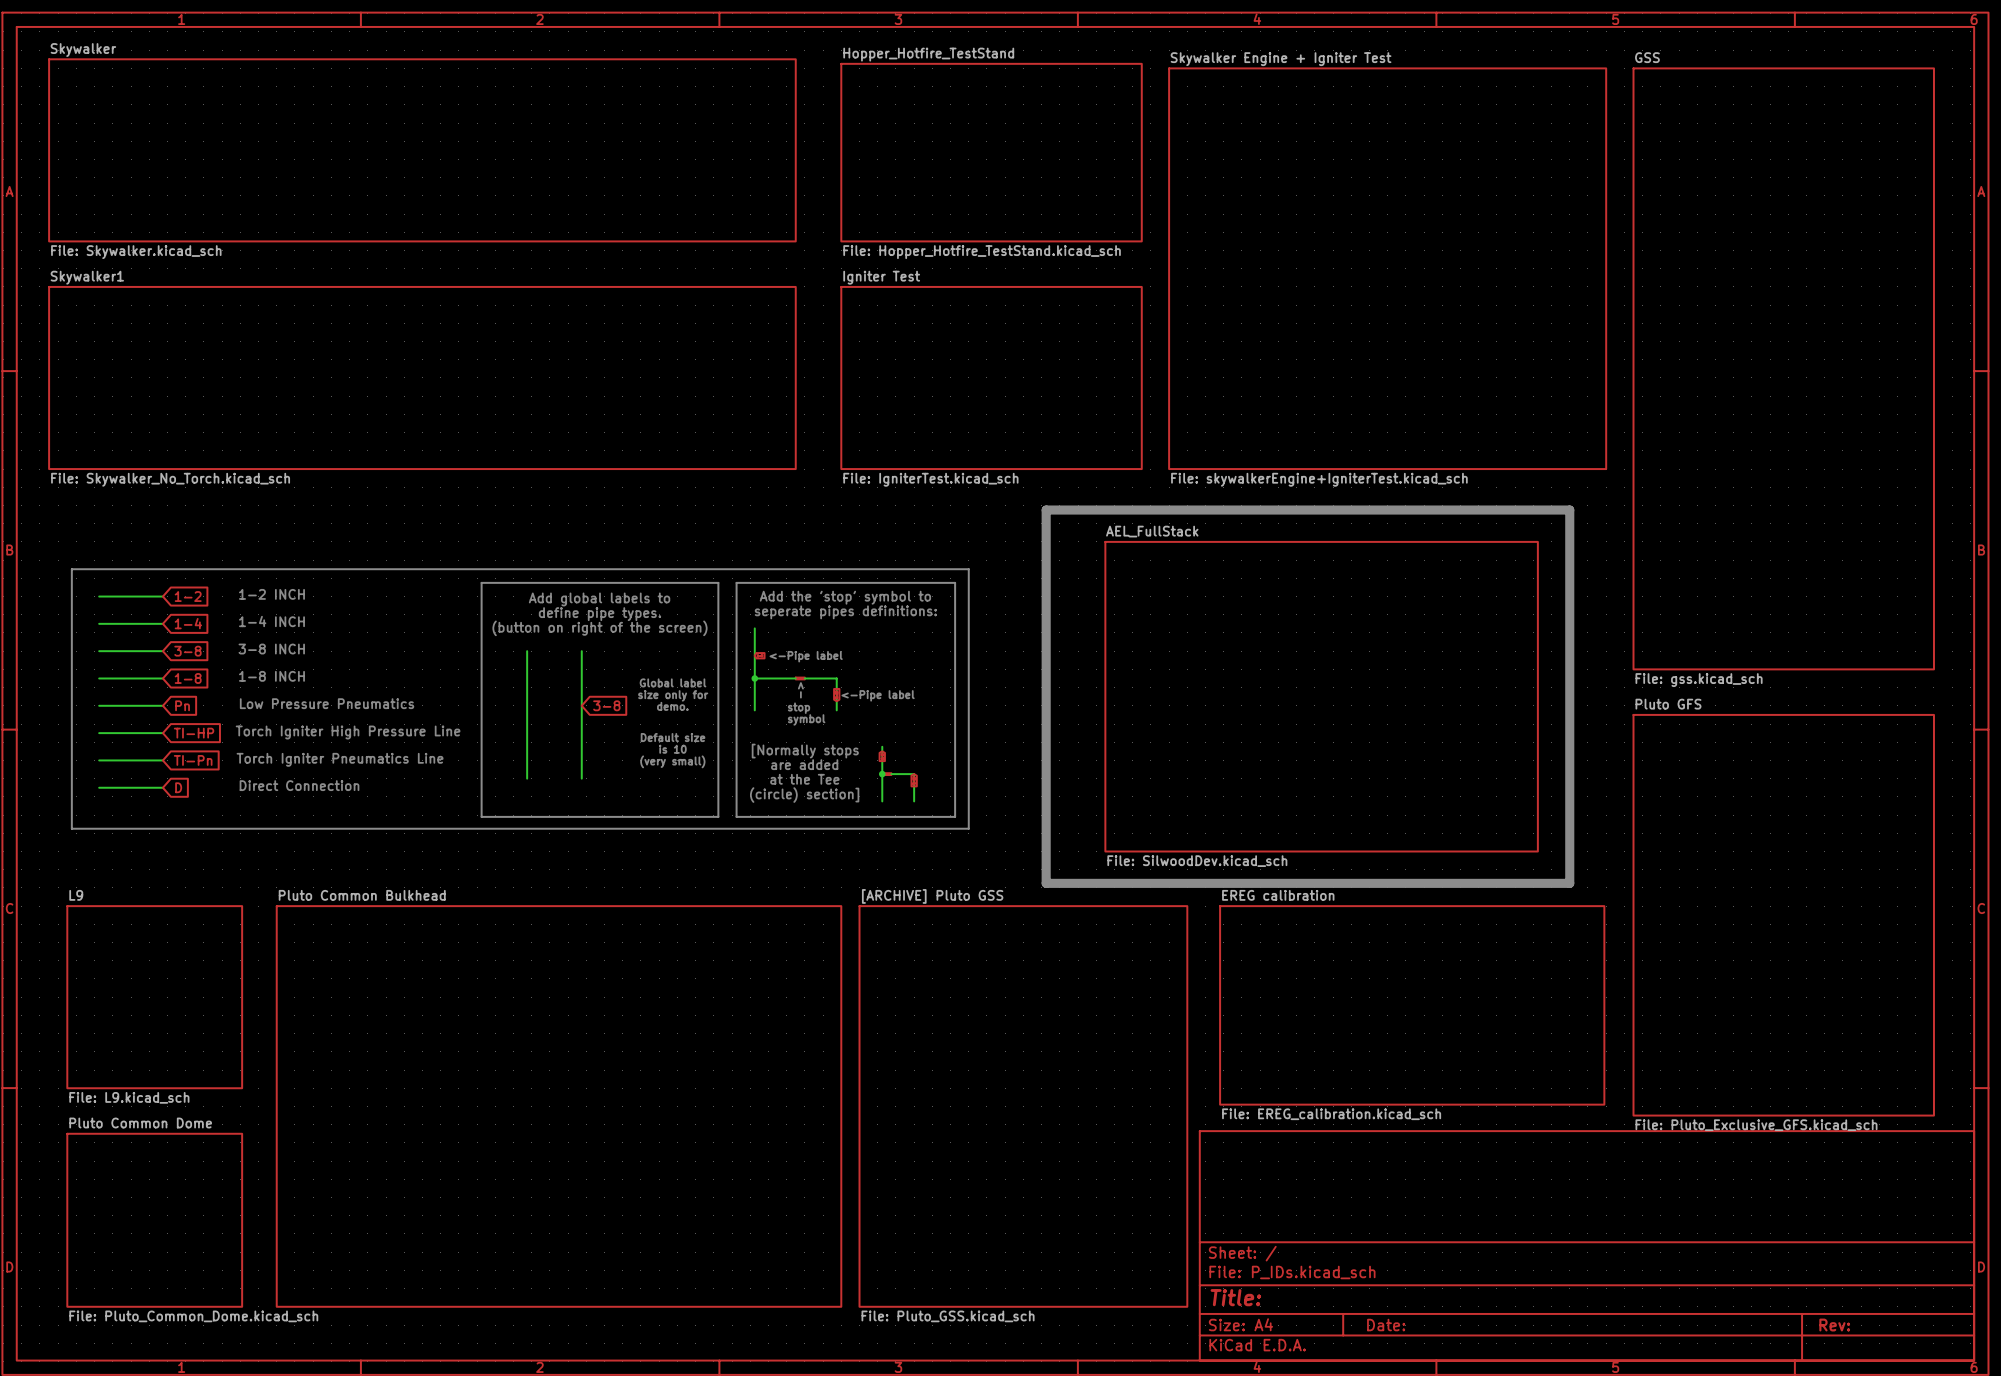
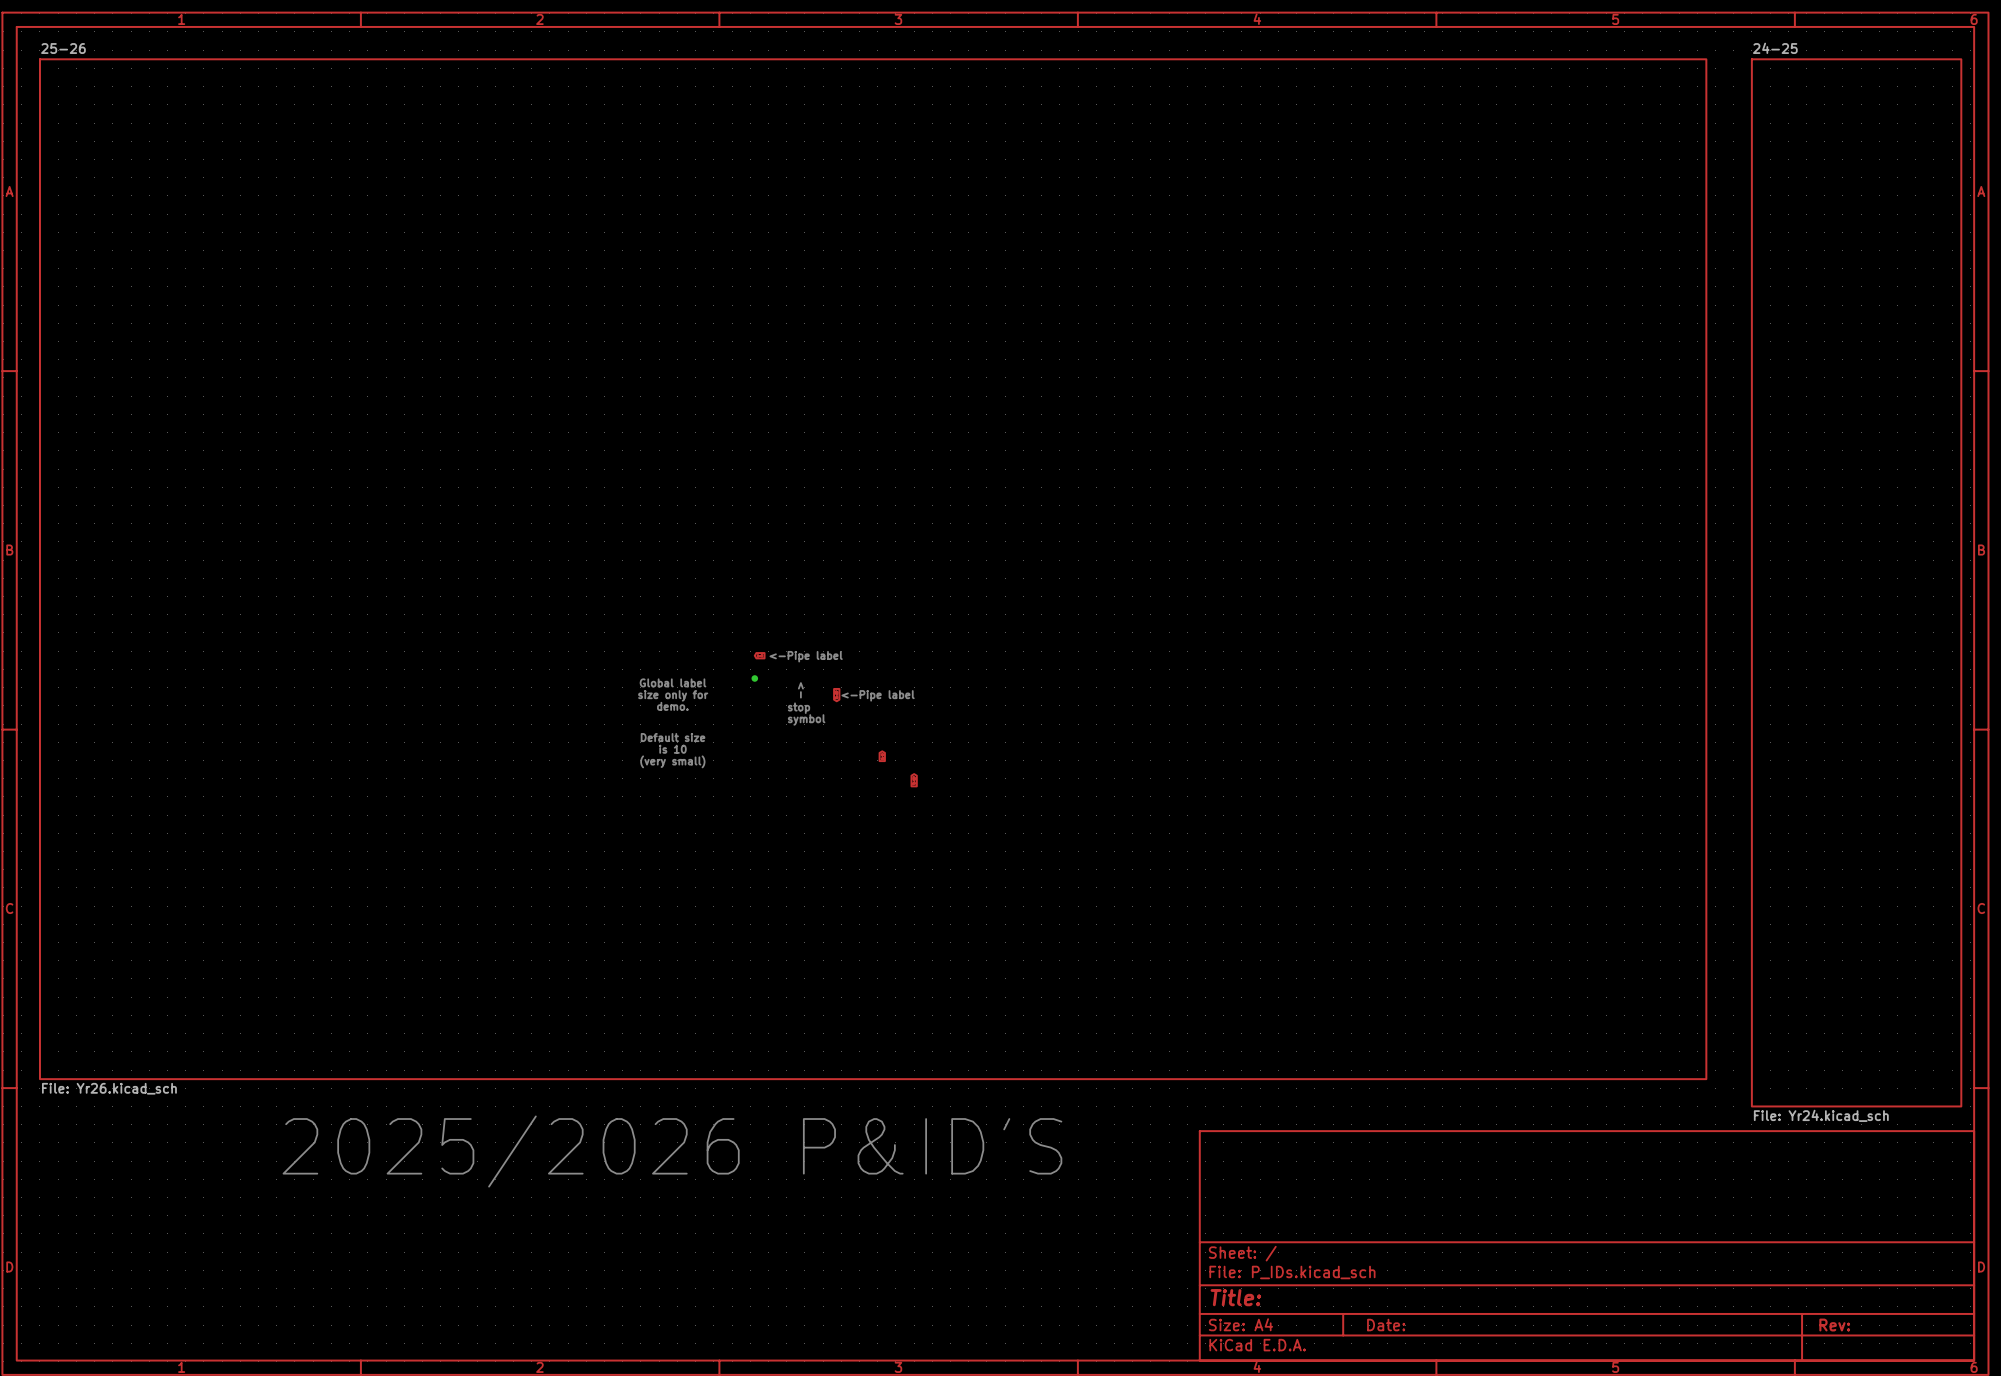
sheet Skywalker: File: Skywalker.kicad_sch (422, 150) -> none
sheet Hopper_Hotfire_TestStand: File: Hopper_Hotfire_TestStand.kicad_sch (991, 152) -> none
sheet Skywalker Engine + Igniter Test: File: skywalkerEngine+IgniterTest.kicad_sch (1387, 268) -> none
sheet GSS: File: gss.kicad_sch (1783, 368) -> none
sheet Skywalker1: File: Skywalker_No_Torch.kicad_sch (422, 377) -> none
sheet Igniter Test: File: IgniterTest.kicad_sch (991, 377) -> none
line: (1046, 510) (1569, 510) (1569, 883) (1046, 883) (1046, 510) -> none
line: (71, 569) (968, 569) (968, 828) (71, 828) (71, 569) -> none
sheet 25-26: none -> File: Yr26.kicad_sch (873, 569)
line: (481, 582) (718, 582) (718, 816) (481, 816) (481, 582) -> none
line: (736, 582) (955, 582) (955, 816) (736, 816) (736, 582) -> none
sheet 24-25: none -> File: Yr24.kicad_sch (1856, 582)
text: 1-2 INCH (271, 594) -> none
wire: (99, 596) (162, 596) -> none
global label: 1-2 (188, 596) -> none
text: Add the 'stop' symbol to (845, 597) -> none
text: Add global labels to (599, 599) -> none
text: seperate pipes definitions: (845, 612) -> none
text: define pipe types. (599, 614) -> none
text: 1-4 INCH (271, 621) -> none
wire: (99, 623) (162, 623) -> none
global label: 1-4 (188, 623) -> none
text: (button on right of the screen) (599, 628) -> none
wire: (754, 628) (754, 710) -> none
text: 3-8 INCH (271, 649) -> none
wire: (99, 651) (162, 651) -> none
global label: 3-8 (187, 651) -> none
wire: (527, 651) (527, 778) -> none
wire: (581, 651) (581, 778) -> none
text: 1-8 INCH (271, 676) -> none
wire: (99, 678) (162, 678) -> none
global label: 1-8 (188, 678) -> none
wire: (754, 678) (795, 678) -> none
part: (800, 678) -> none
wire: (804, 678) (836, 678) (836, 710) -> none
sheet AEL_FullStack: File: SilwoodDev.kicad_sch (1321, 696) -> none
text: Low Pressure Pneumatics (327, 703) -> none
wire: (99, 705) (162, 705) -> none
global label: Pn (182, 705) -> none
global label: 3-8 (606, 705) -> none
text: Torch Igniter High Pressure Line (348, 732) -> none
wire: (99, 733) (162, 733) -> none
global label: TI-HP (194, 733) -> none
wire: (882, 746) (882, 801) -> none
text: [Normally stops (805, 751) -> none
text: Torch Igniter Pneumatics Line (340, 759) -> none
wire: (99, 760) (162, 760) -> none
global label: TI-Pn (193, 760) -> none
text: are added (804, 764) -> none
junction: (882, 774) -> none
part: (886, 774) -> none
wire: (891, 774) (914, 774) (914, 801) -> none
text: at the Tee (804, 779) -> none
text: Direct Connection (299, 785) -> none
wire: (99, 787) (162, 787) -> none
global label: D (178, 787) -> none
text: (circle) section] (804, 795) -> none
sheet Pluto GFS: File: Pluto_Exclusive_GFS.kicad_sch (1783, 915) -> none
sheet L9: File: L9.kicad_sch (154, 997) -> none
sheet EREG calibration: File: EREG_calibration.kicad_sch (1412, 1005) -> none
sheet Pluto Common Bulkhead: (559, 1106) -> none
sheet [ARCHIVE] Pluto GSS: File: Pluto_GSS.kicad_sch (1023, 1106) -> none
text: none -> 2025/2026 P&ID'S (672, 1151)
sheet Pluto Common Dome: File: Pluto_Common_Dome.kicad_sch (154, 1220) -> none

